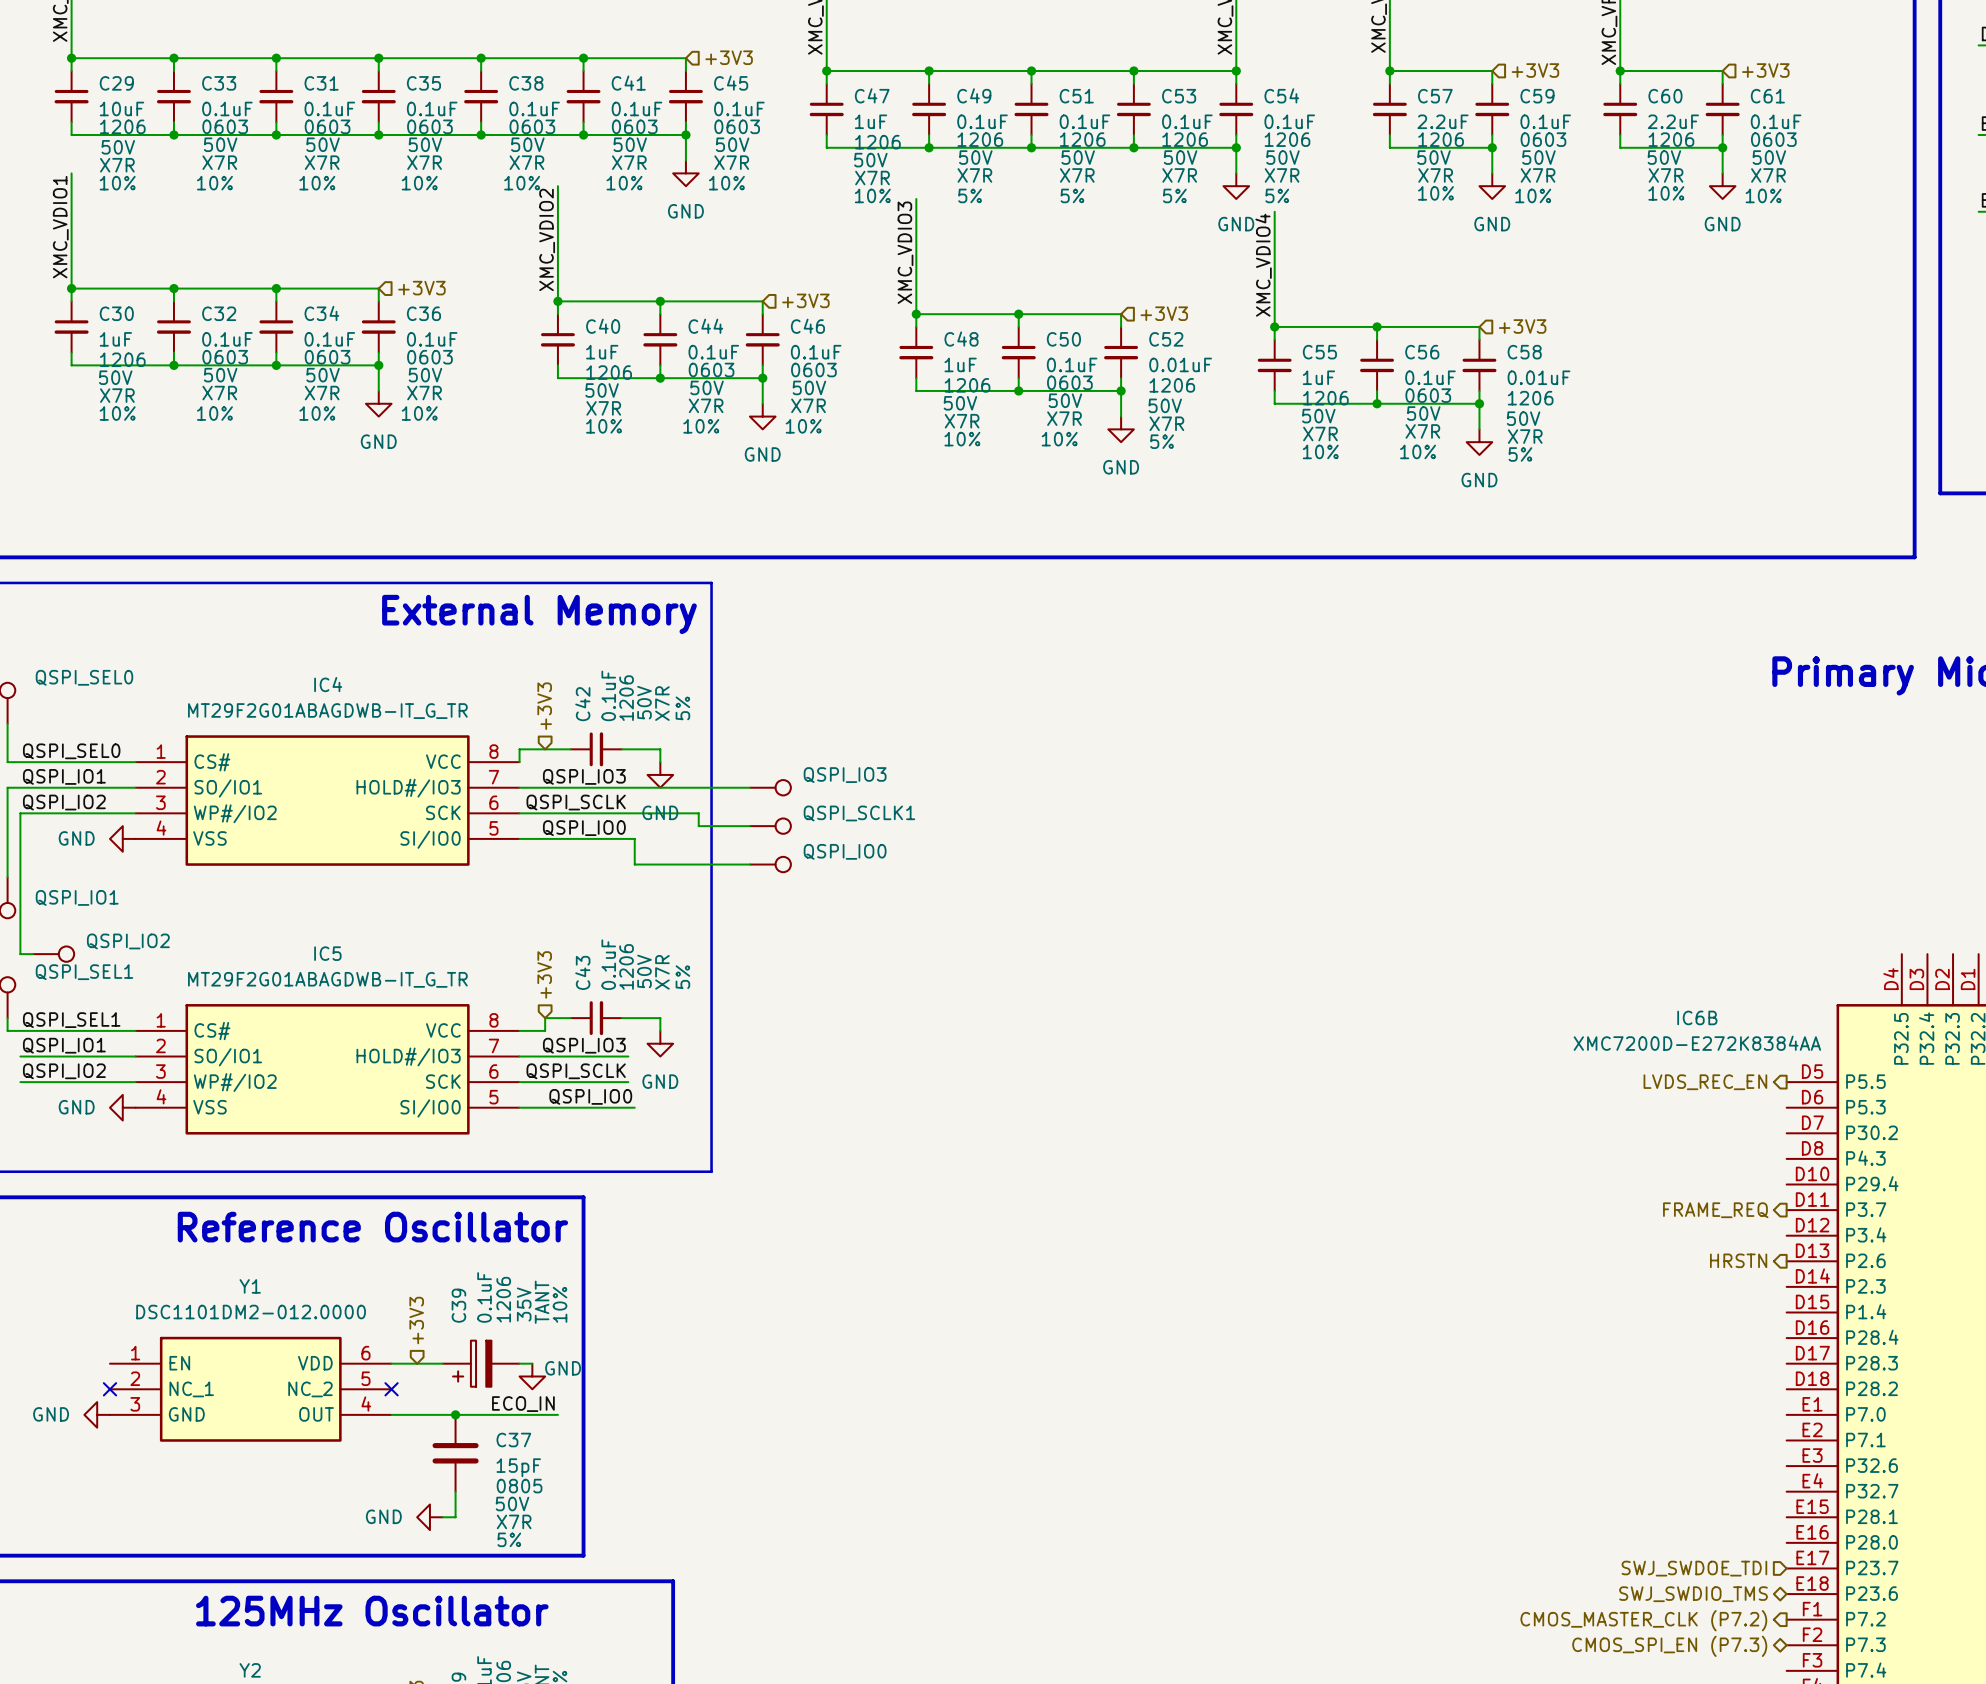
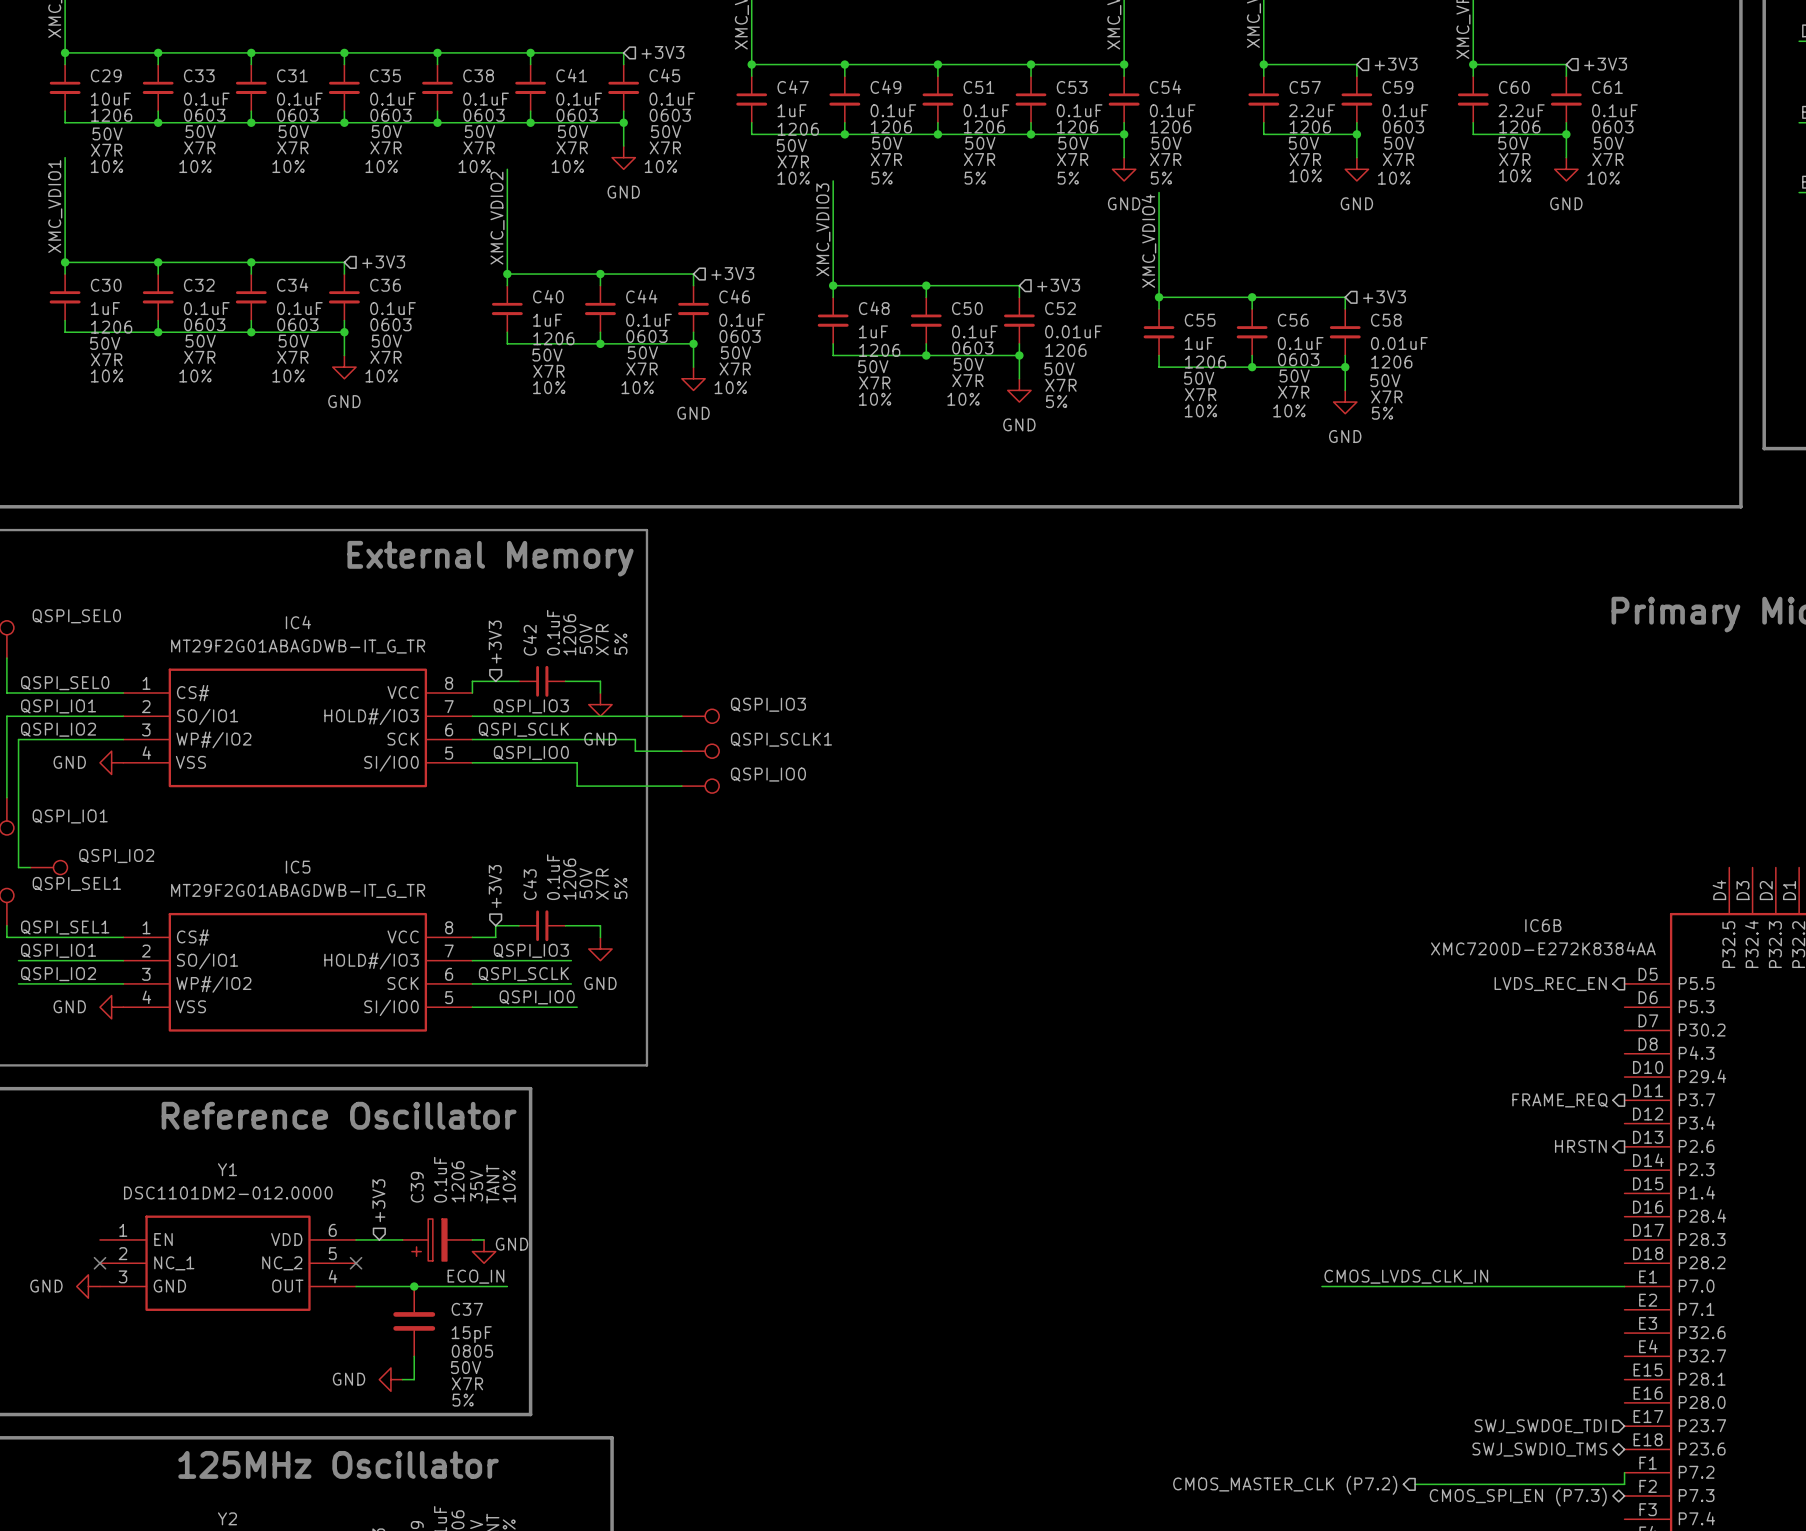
label: none -> CMOS_LVDS_CLK_IN (1406, 1276)
wire: none -> (1321, 1286) (1624, 1286)
wire: none -> (1624, 1472) (1624, 1484) (1415, 1484)
hierarchical label position: CMOS_MASTER_CLK (P7.2) (1643, 1620) -> CMOS_MASTER_CLK (P7.2) (1285, 1485)

